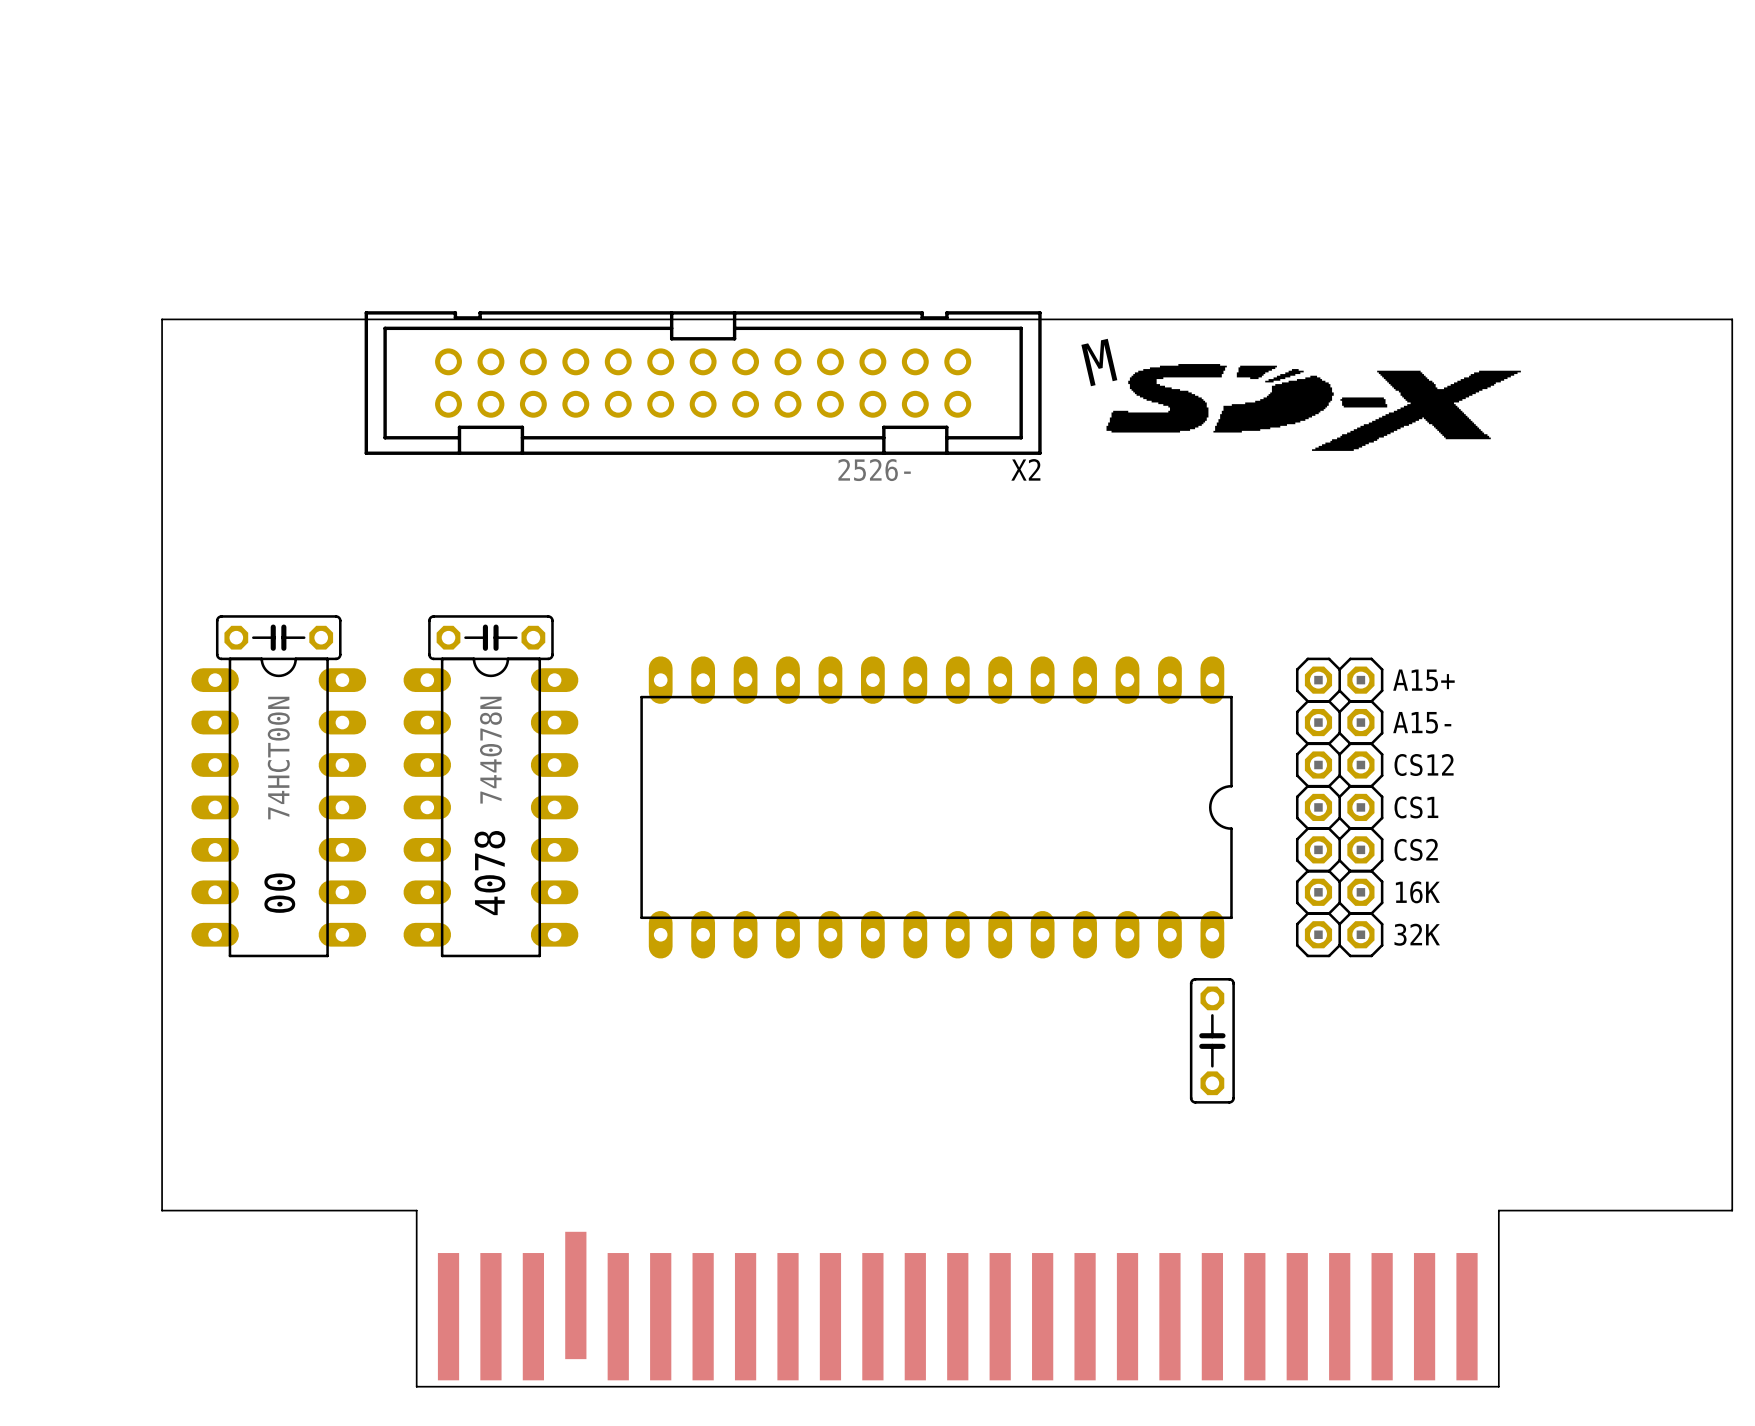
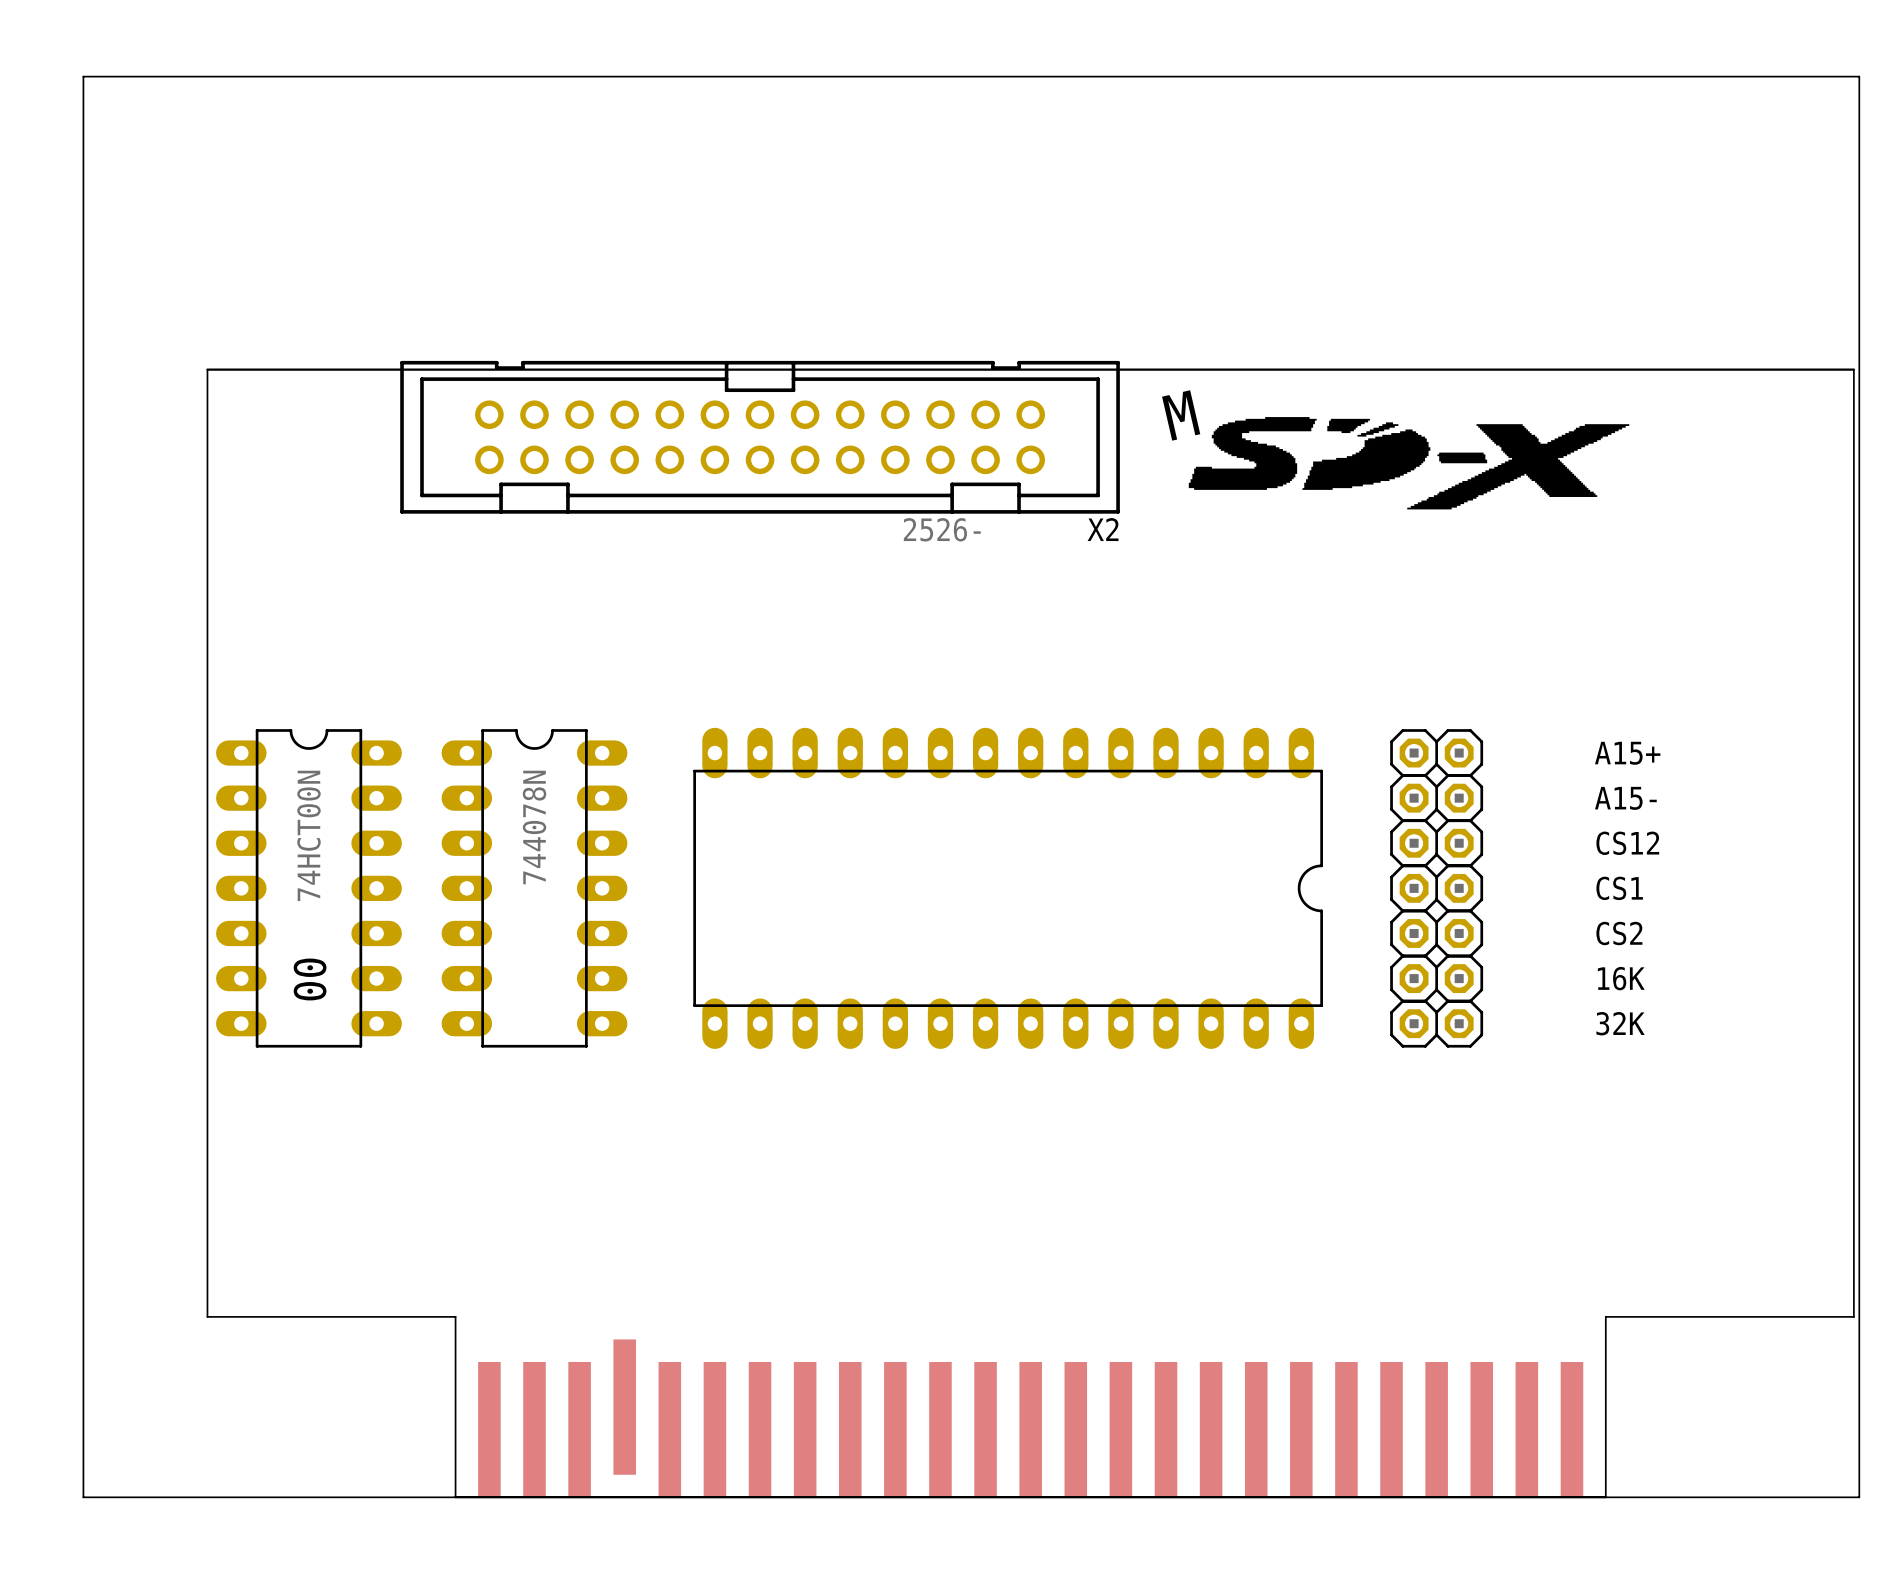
board edge: none -> (83, 76) (1859, 76) (1859, 1497) (83, 1497) (83, 76)
part footprint: [162, 319, 1733, 1387] -> [206, 368, 1856, 1498]
part: (278, 637) -> none
part: (490, 637) -> none
A15+ name position: A15+ (1423, 680) -> A15+ (1627, 753)
A15- name position: A15- (1422, 722) -> A15- (1625, 798)
CS12 name position: CS12 (1424, 765) -> CS12 (1627, 843)
CS1 name position: CS1 (1416, 807) -> CS1 (1619, 888)
CS2 name position: CS2 (1416, 849) -> CS2 (1619, 933)
text: 4078 (489, 873) -> none
16K name position: 16K (1417, 892) -> 16K (1621, 978)
32K name position: 32K (1417, 934) -> 32K (1620, 1023)
part: (1212, 1040) -> none

